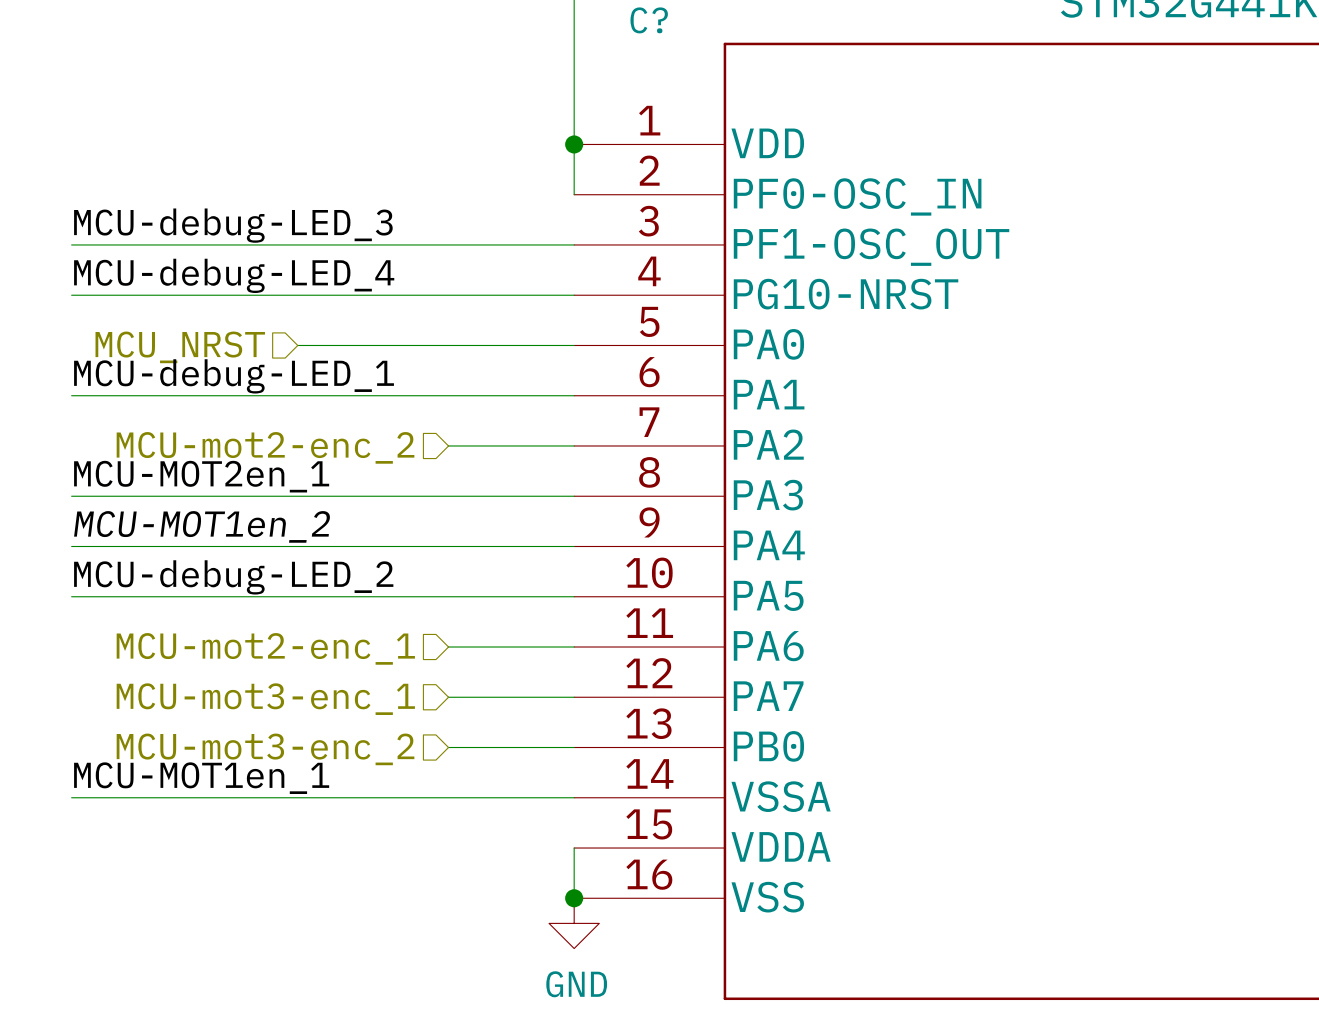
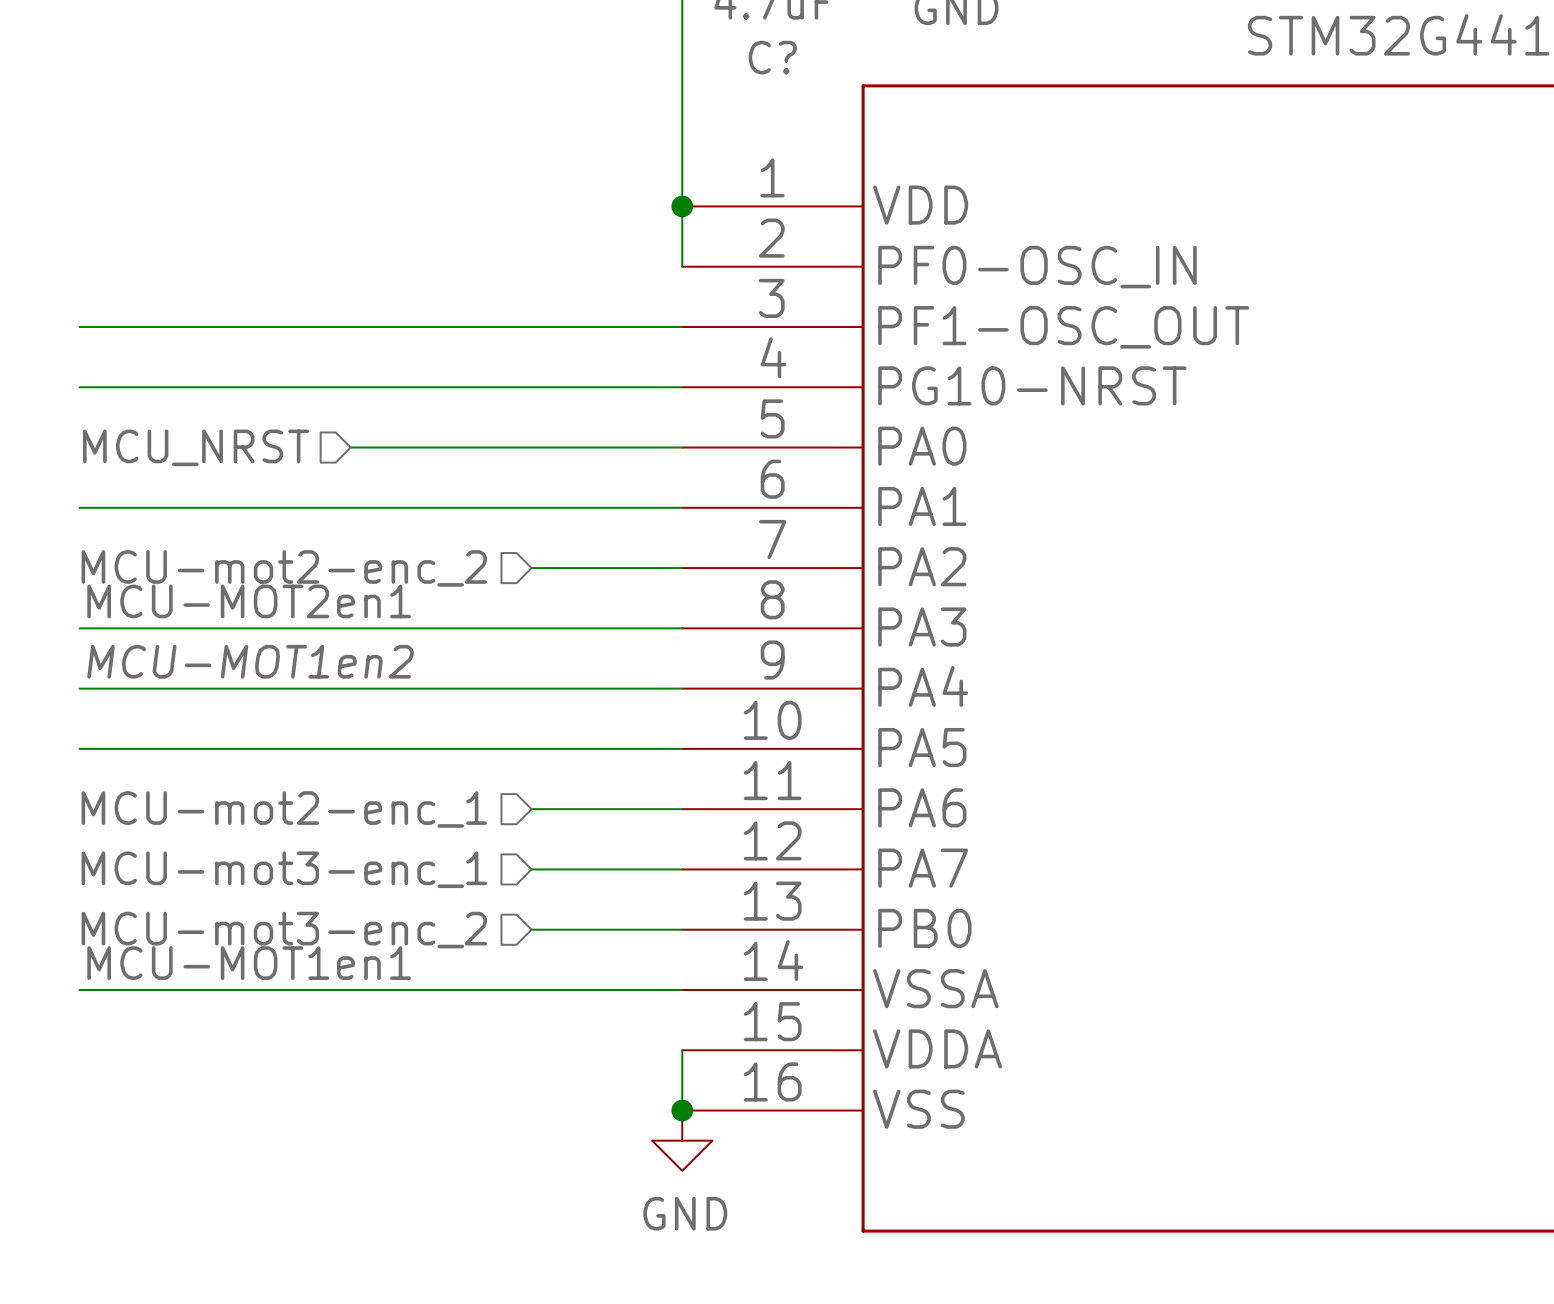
label: MCU-debug-LED_3 (233, 225) -> none
label: MCU-debug-LED_4 (234, 275) -> none
label: MCU-debug-LED_1 (234, 376) -> none
label: MCU-MOT2en_1 (201, 476) -> MCU-MOT2en1 (249, 601)
label: MCU-MOT1en_2 (202, 526) -> MCU-MOT1en2 (250, 661)
label: MCU-debug-LED_2 (233, 577) -> none
label: MCU-MOT1en_1 (201, 778) -> MCU-MOT1en1 (249, 963)

